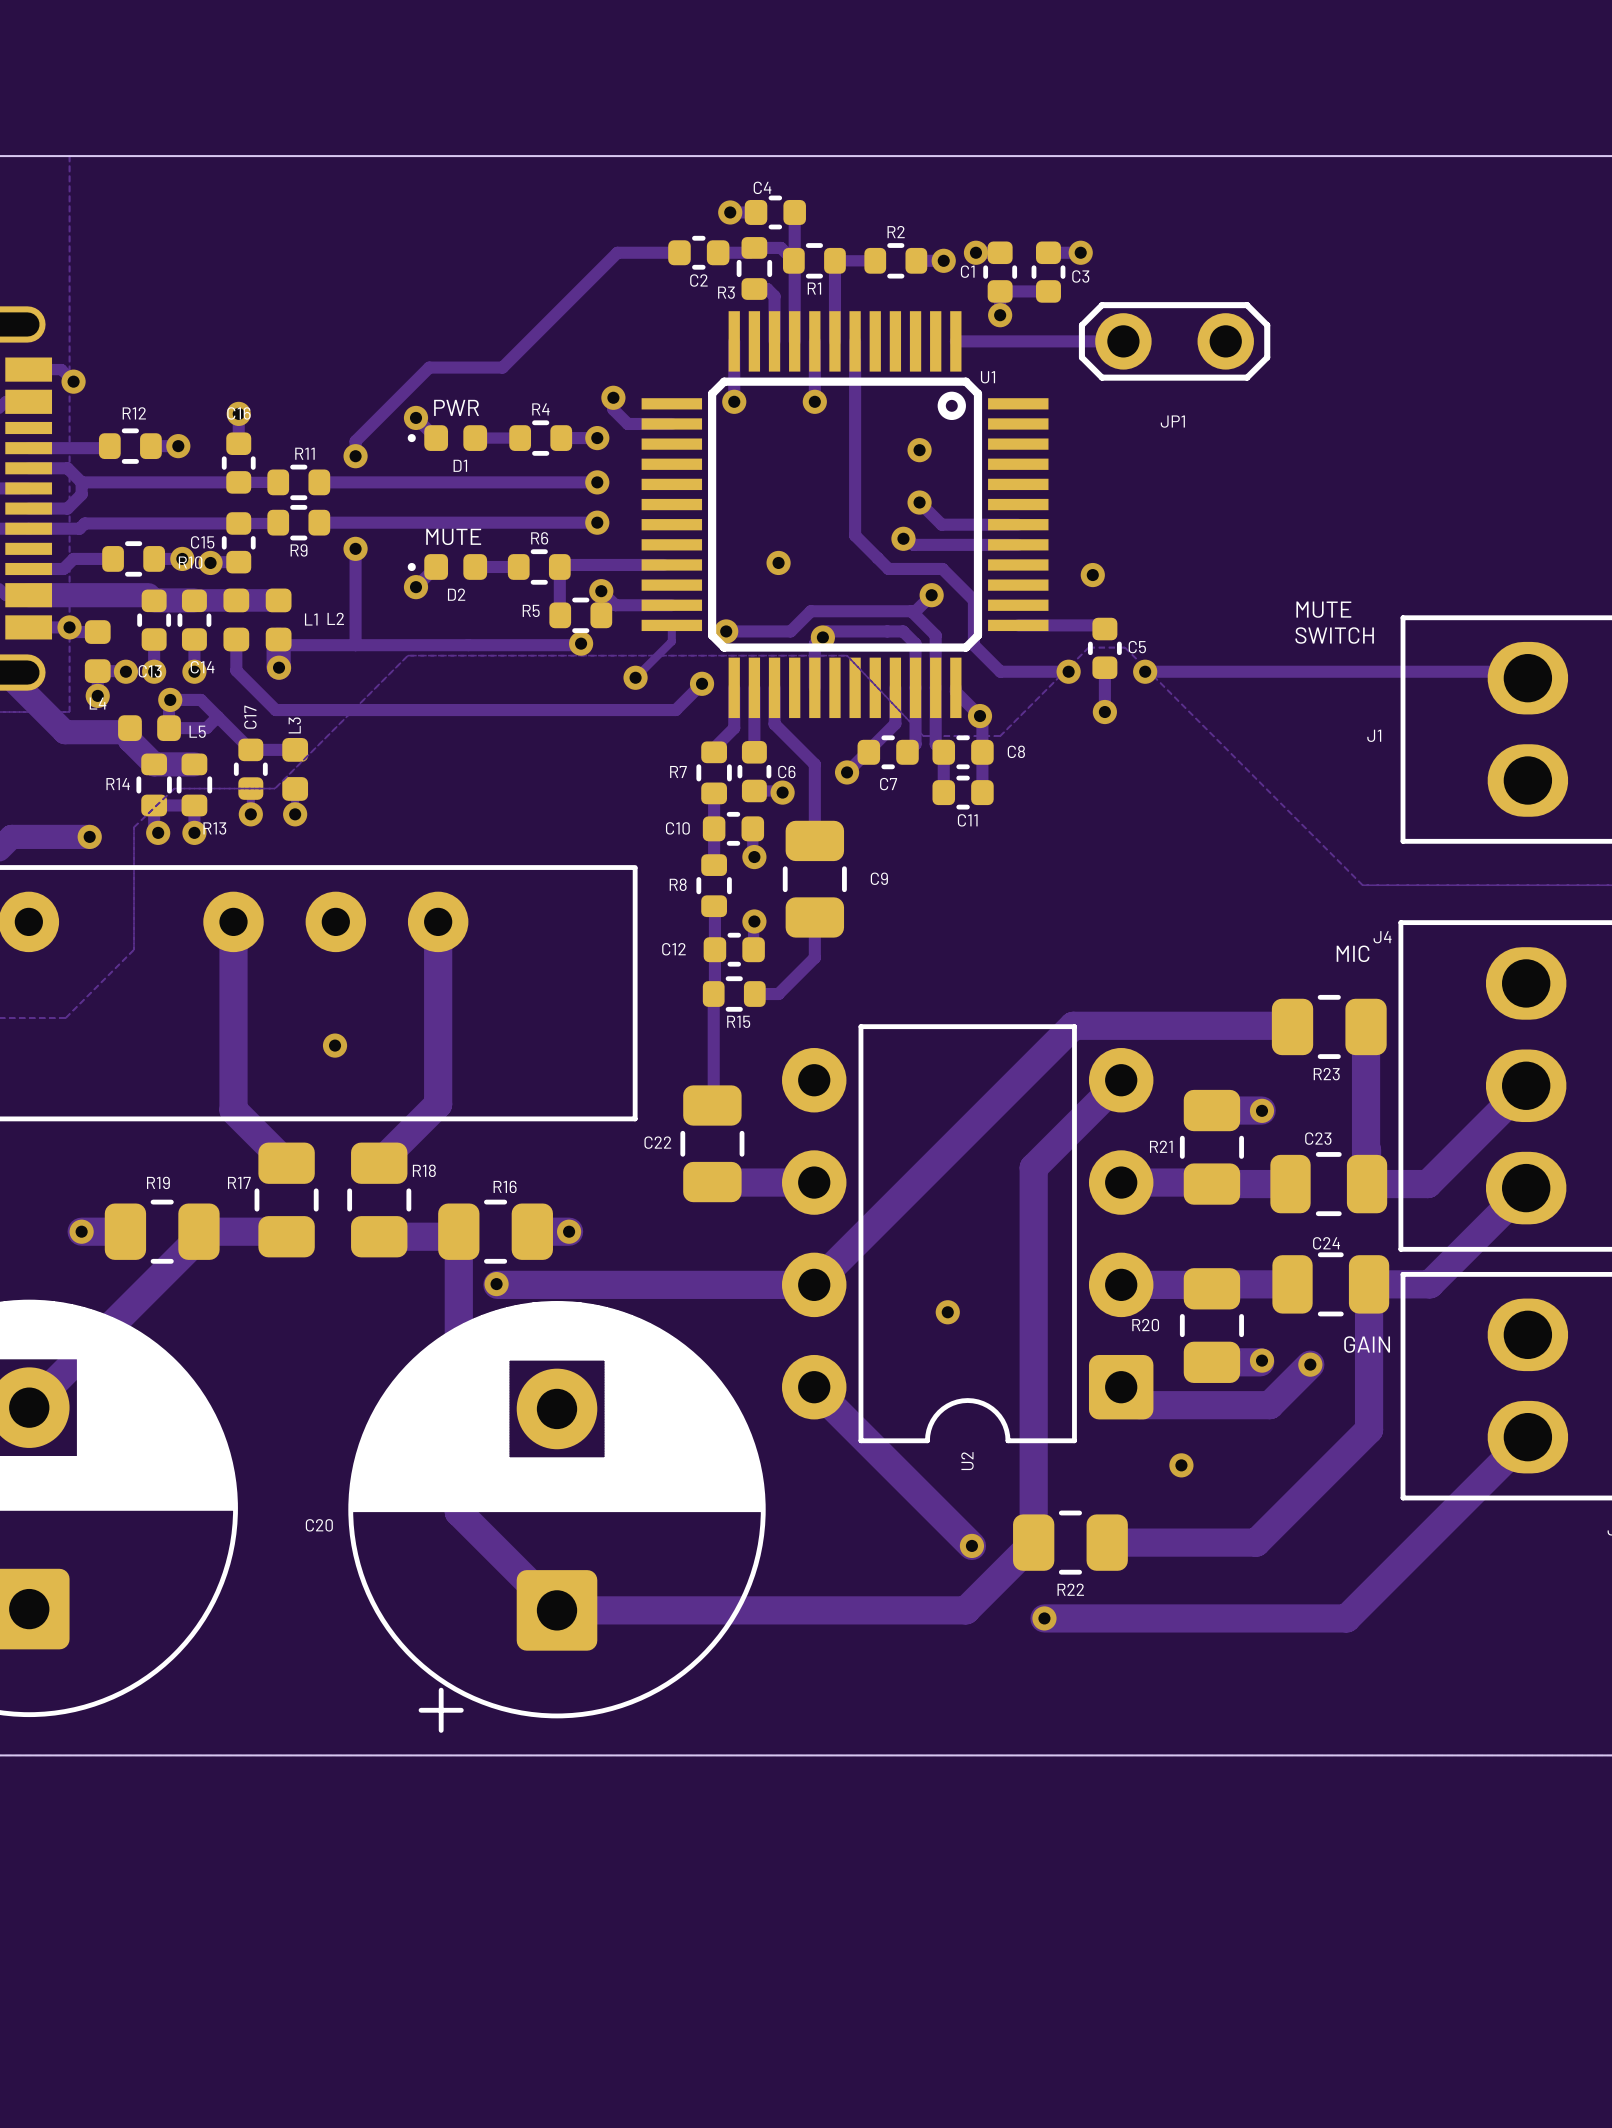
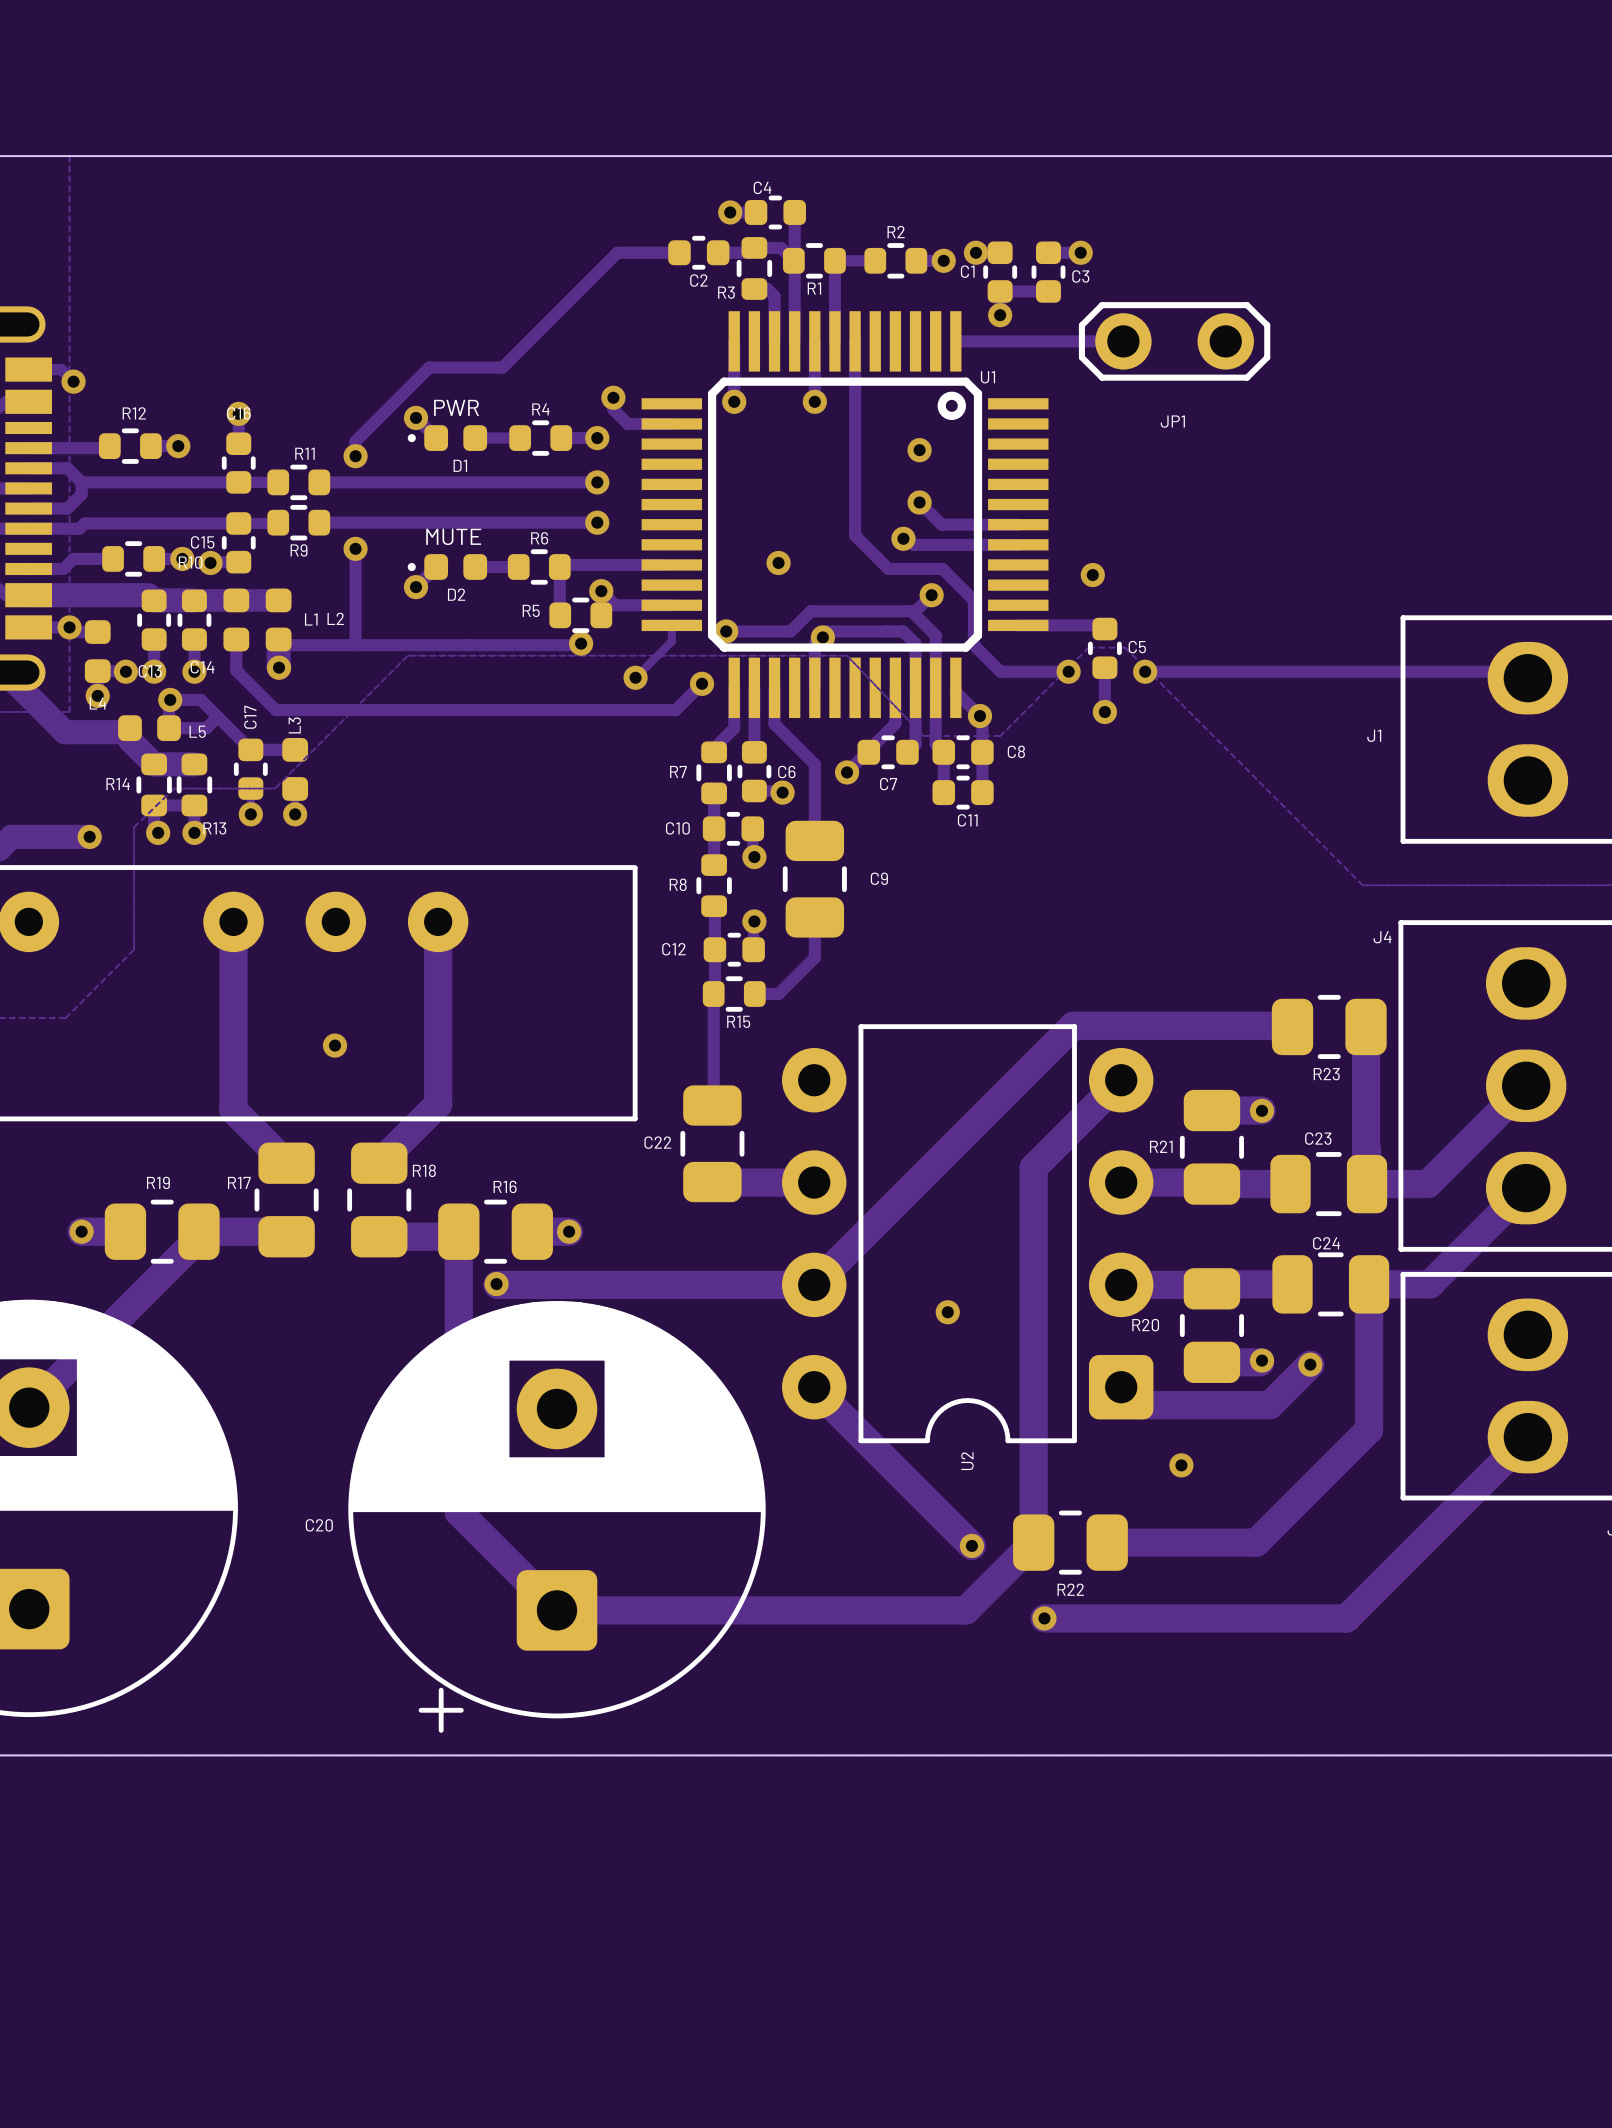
text: MUTE (1323, 609) -> none
text: SWITCH (1334, 635) -> none
text: MIC (1353, 953) -> none
text: GAIN (1367, 1344) -> none

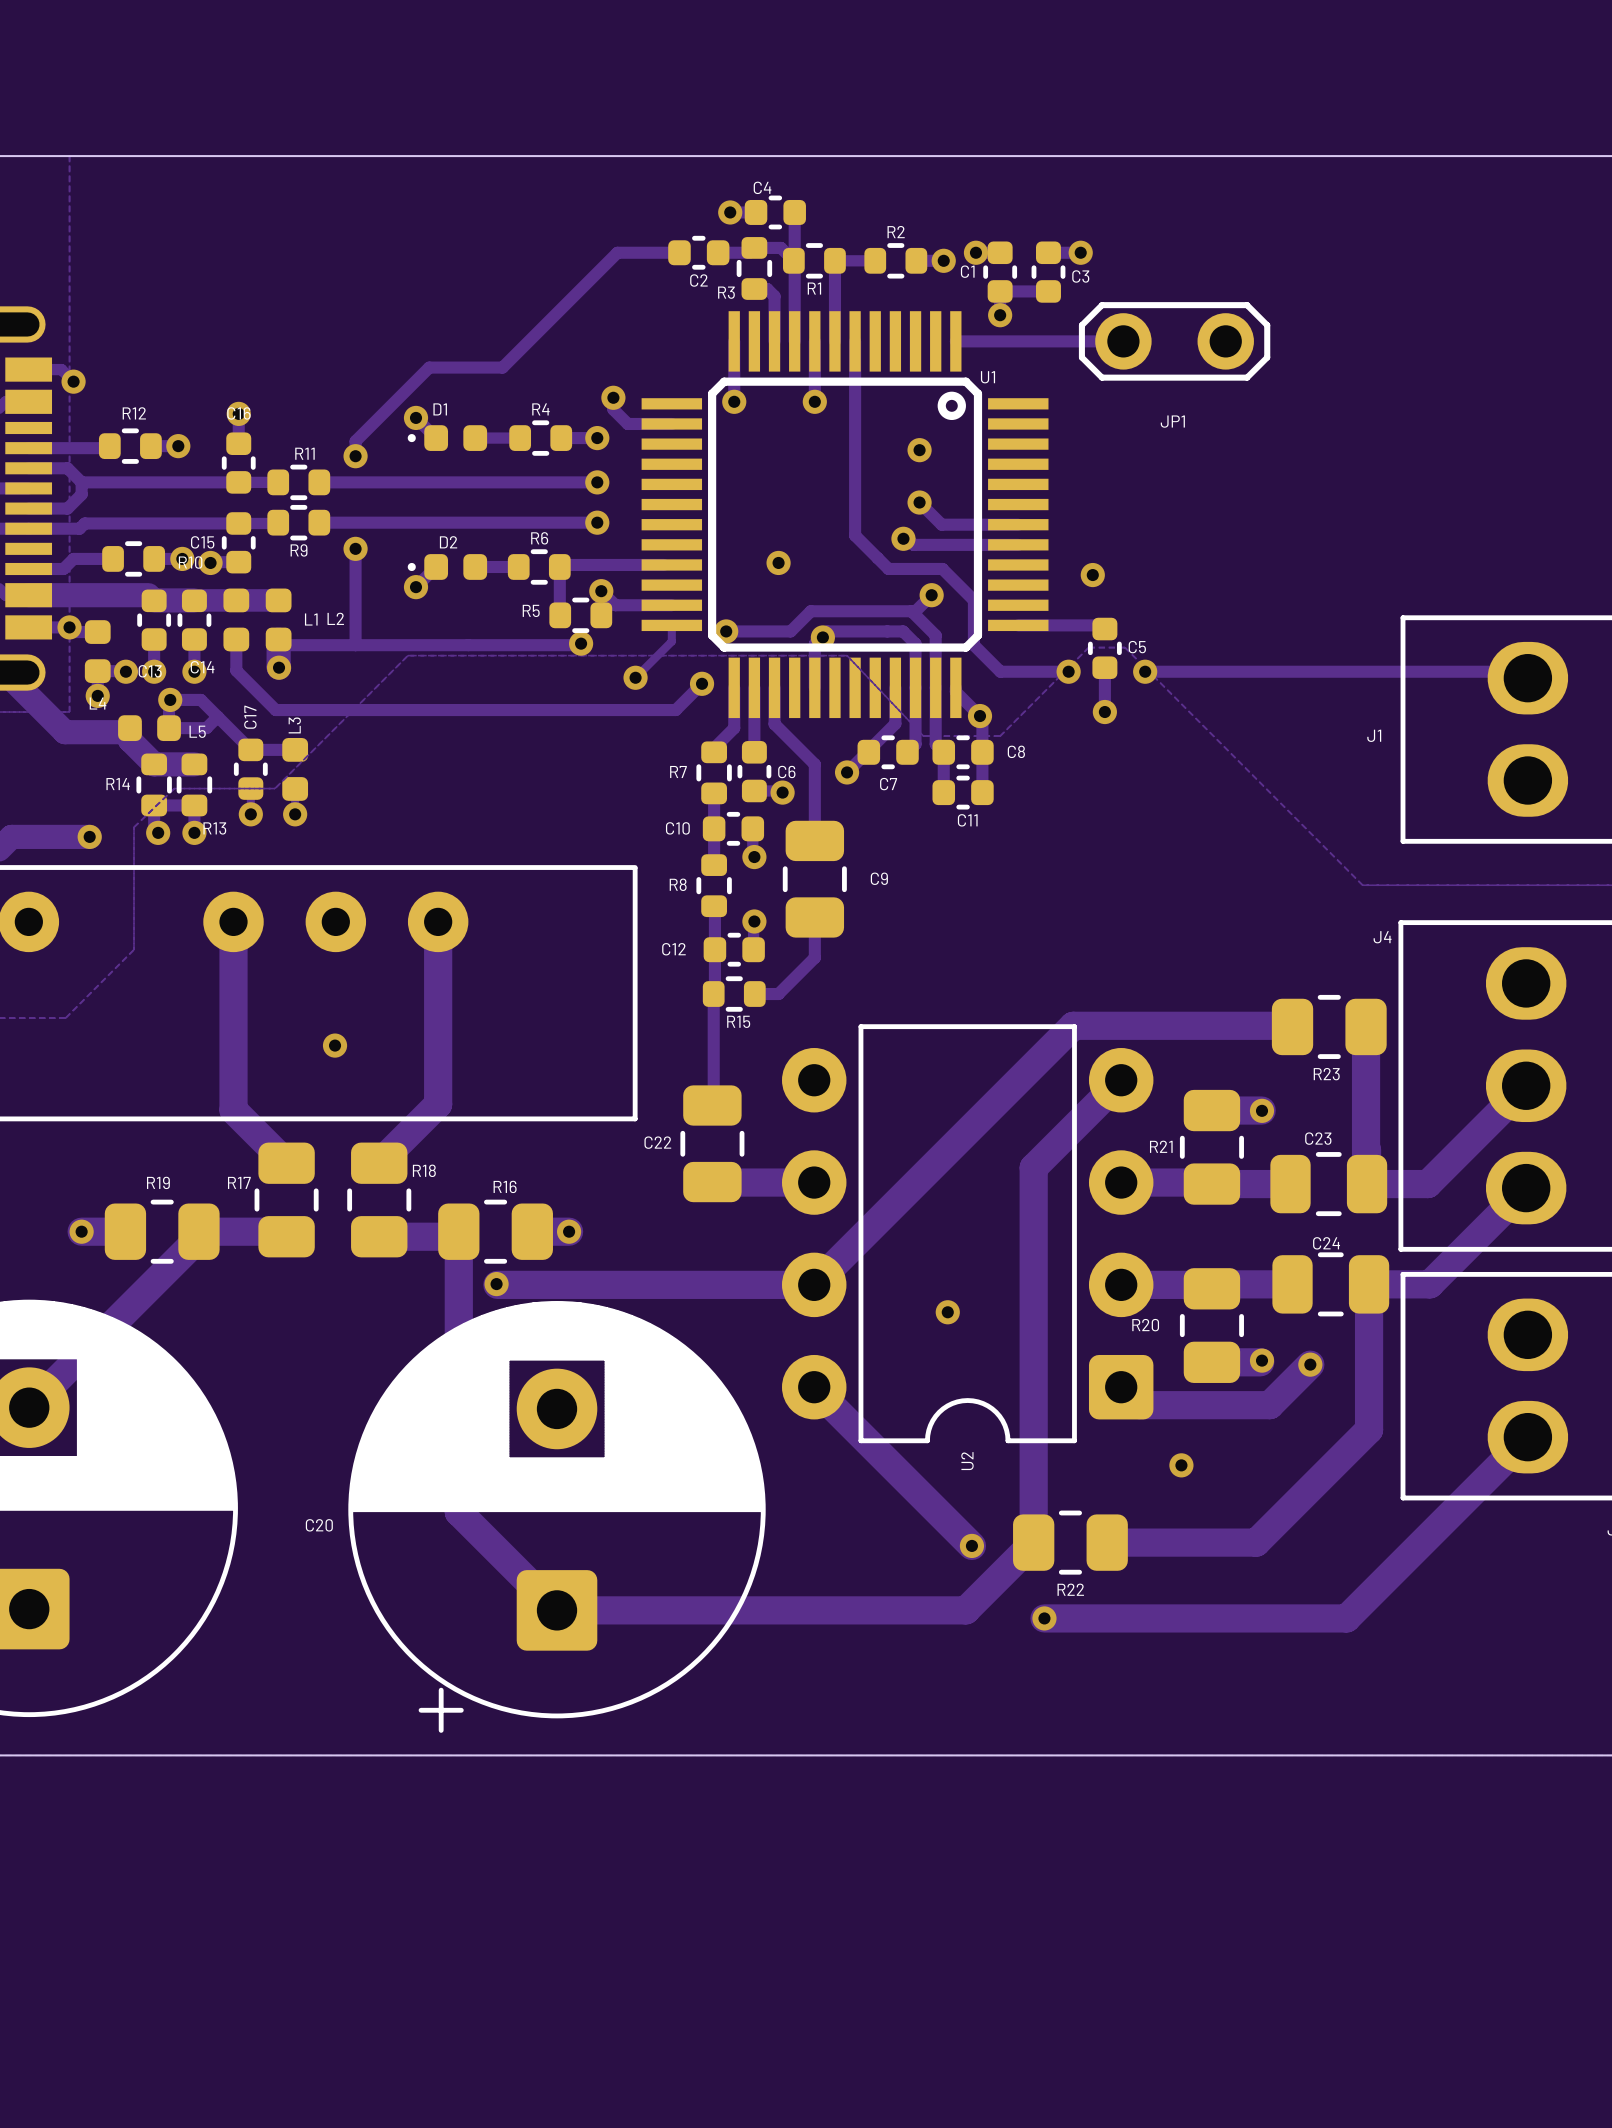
text: PWR (456, 407) -> none
D1 name position: D1 (460, 465) -> D1 (440, 409)
text: MUTE (453, 536) -> none
D2 name position: D2 (456, 594) -> D2 (448, 542)

